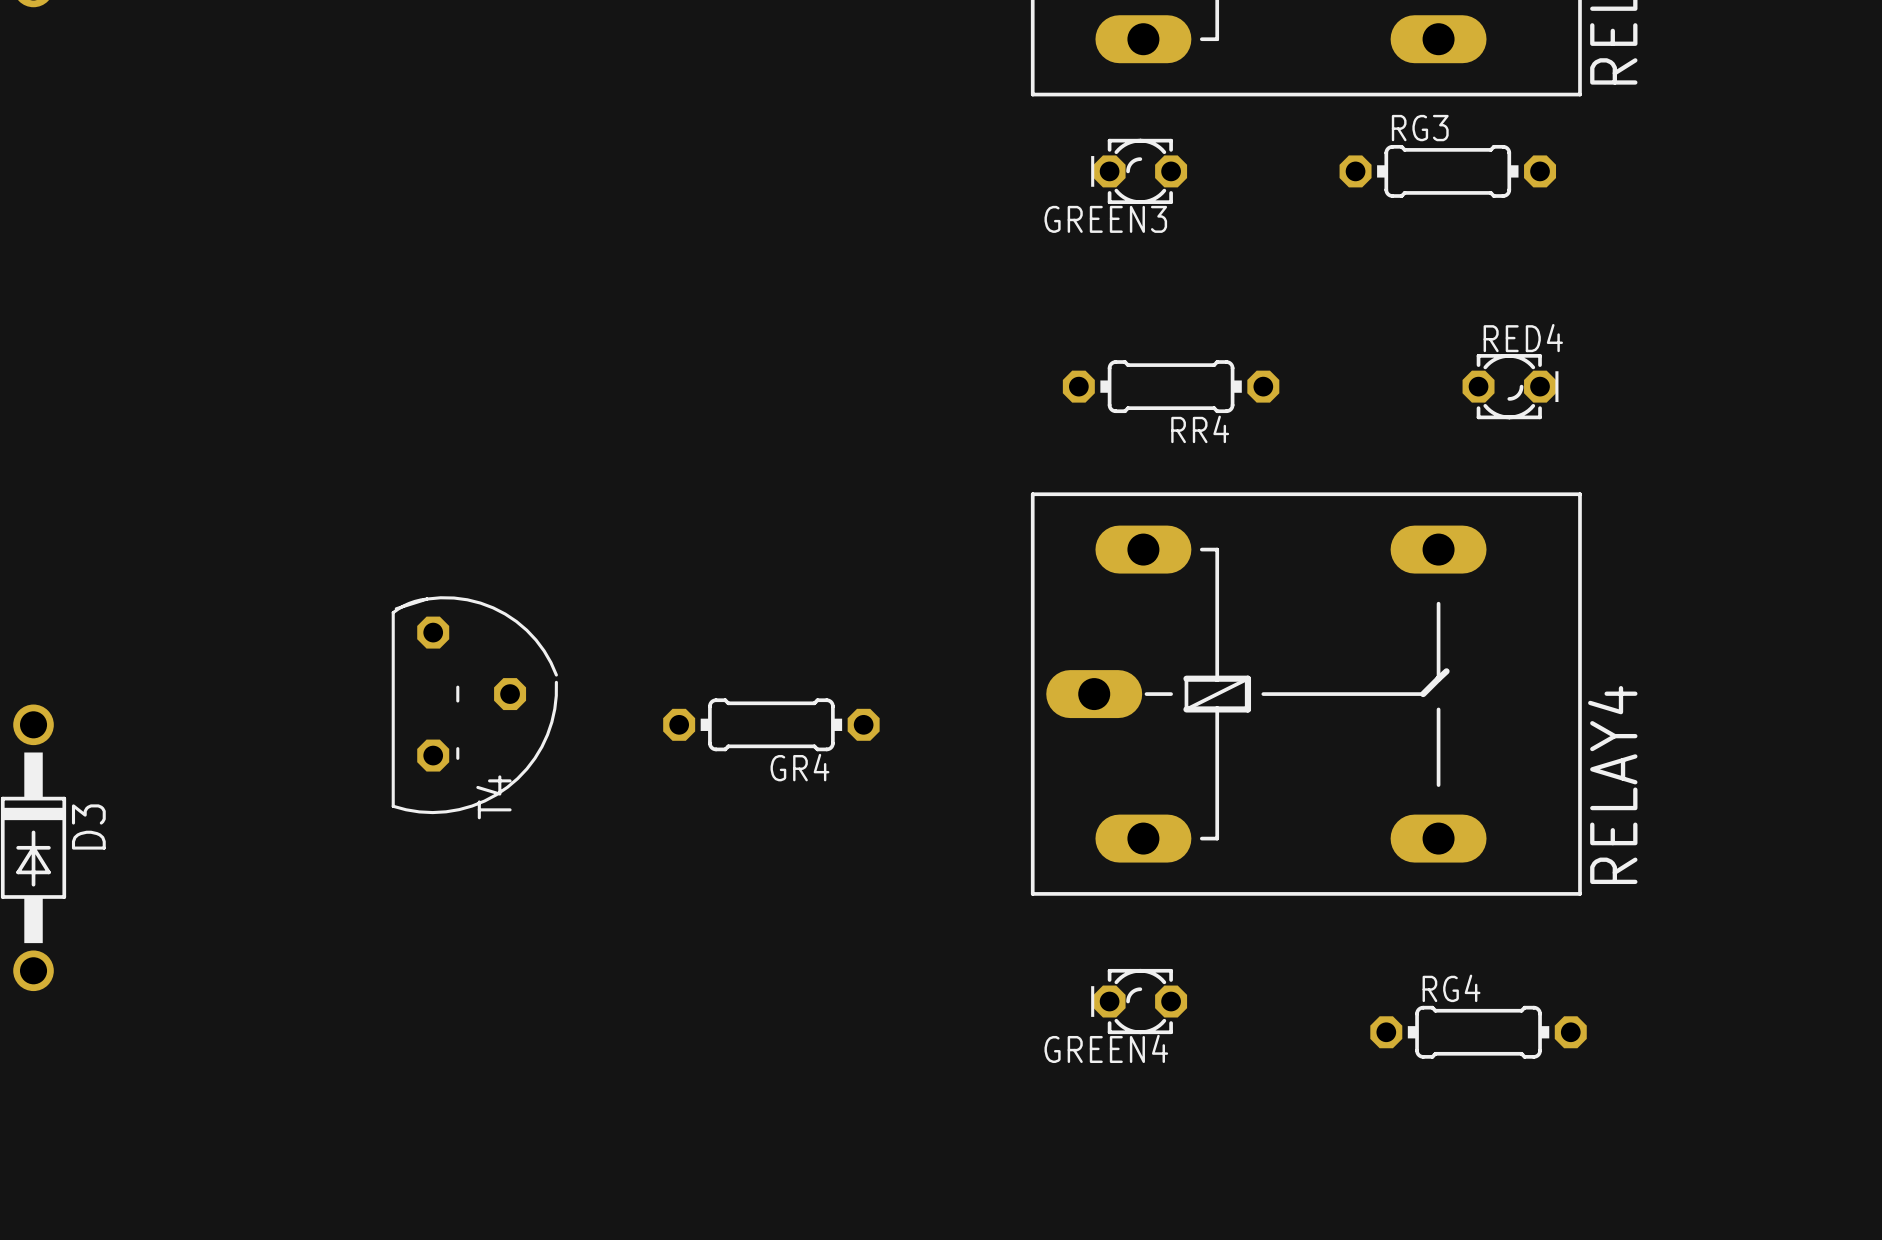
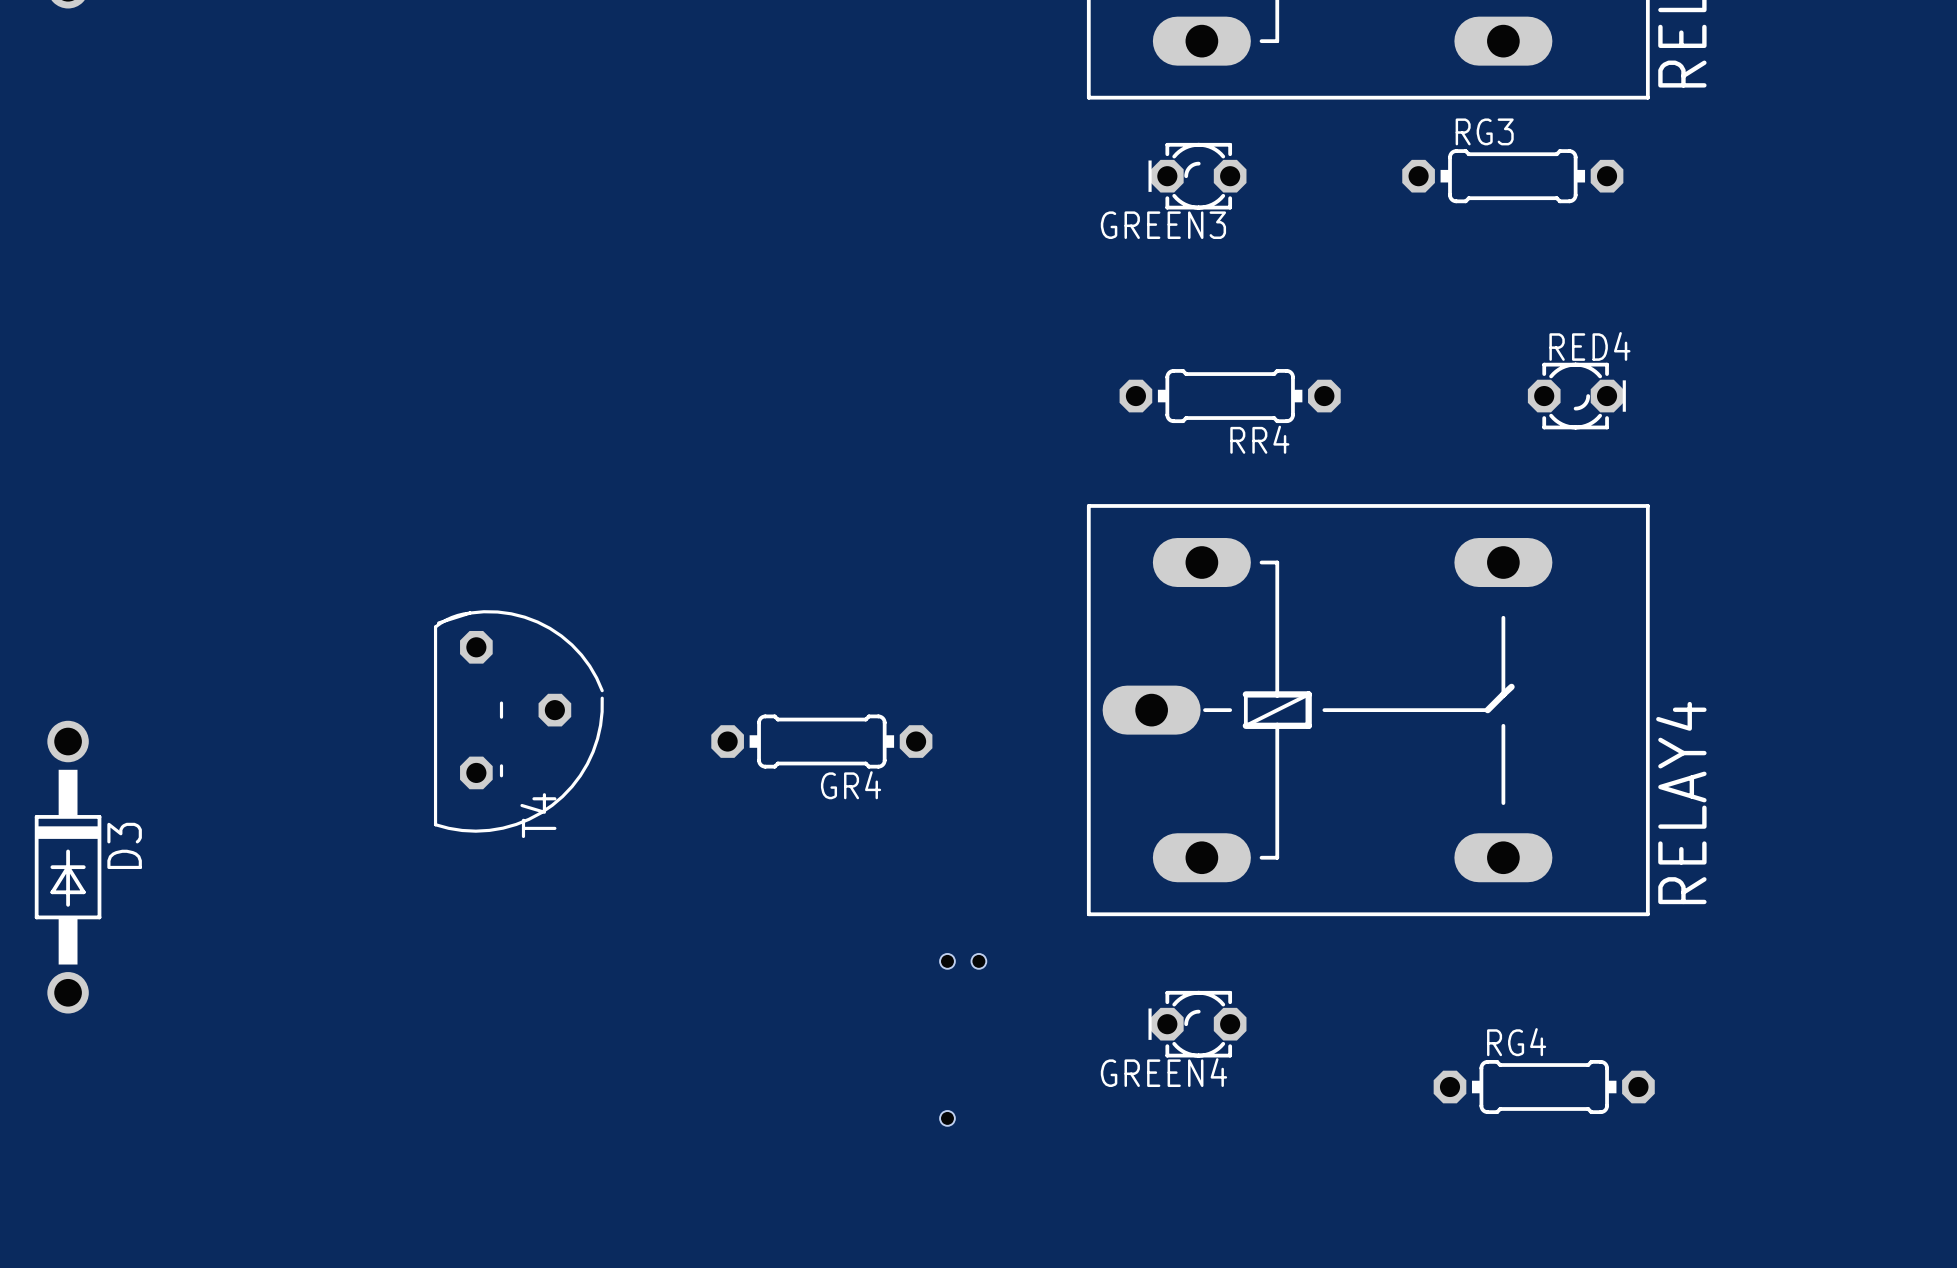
hole: none -> (947, 961)
hole: none -> (978, 961)
RG4 position: (1478, 1032) -> (1544, 1087)
hole: none -> (947, 1118)

